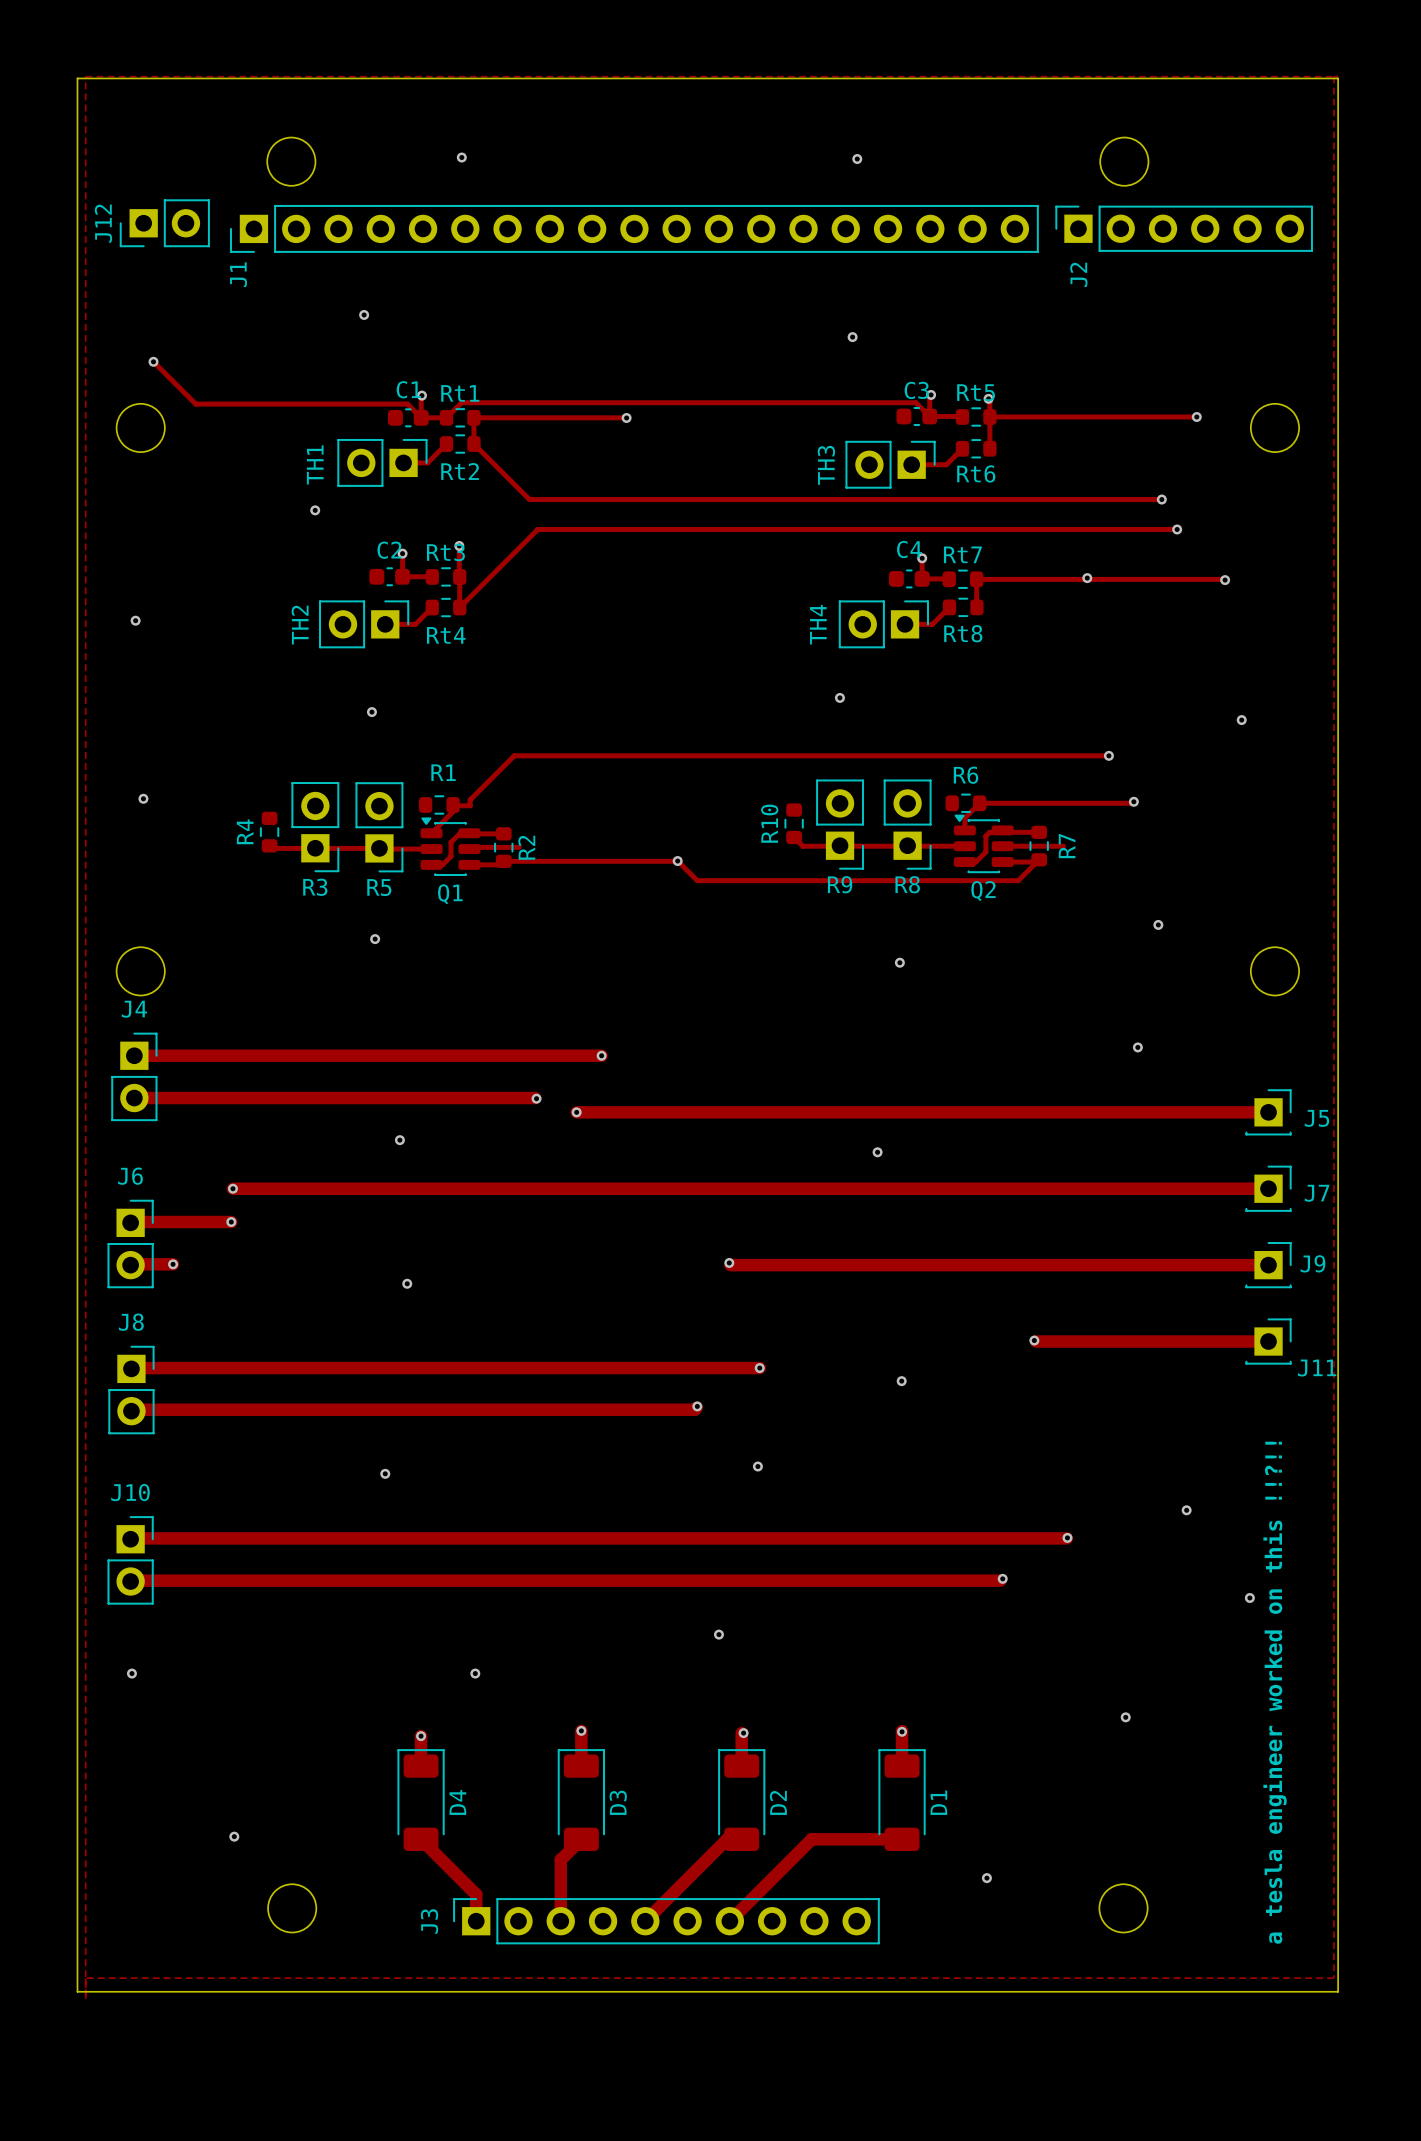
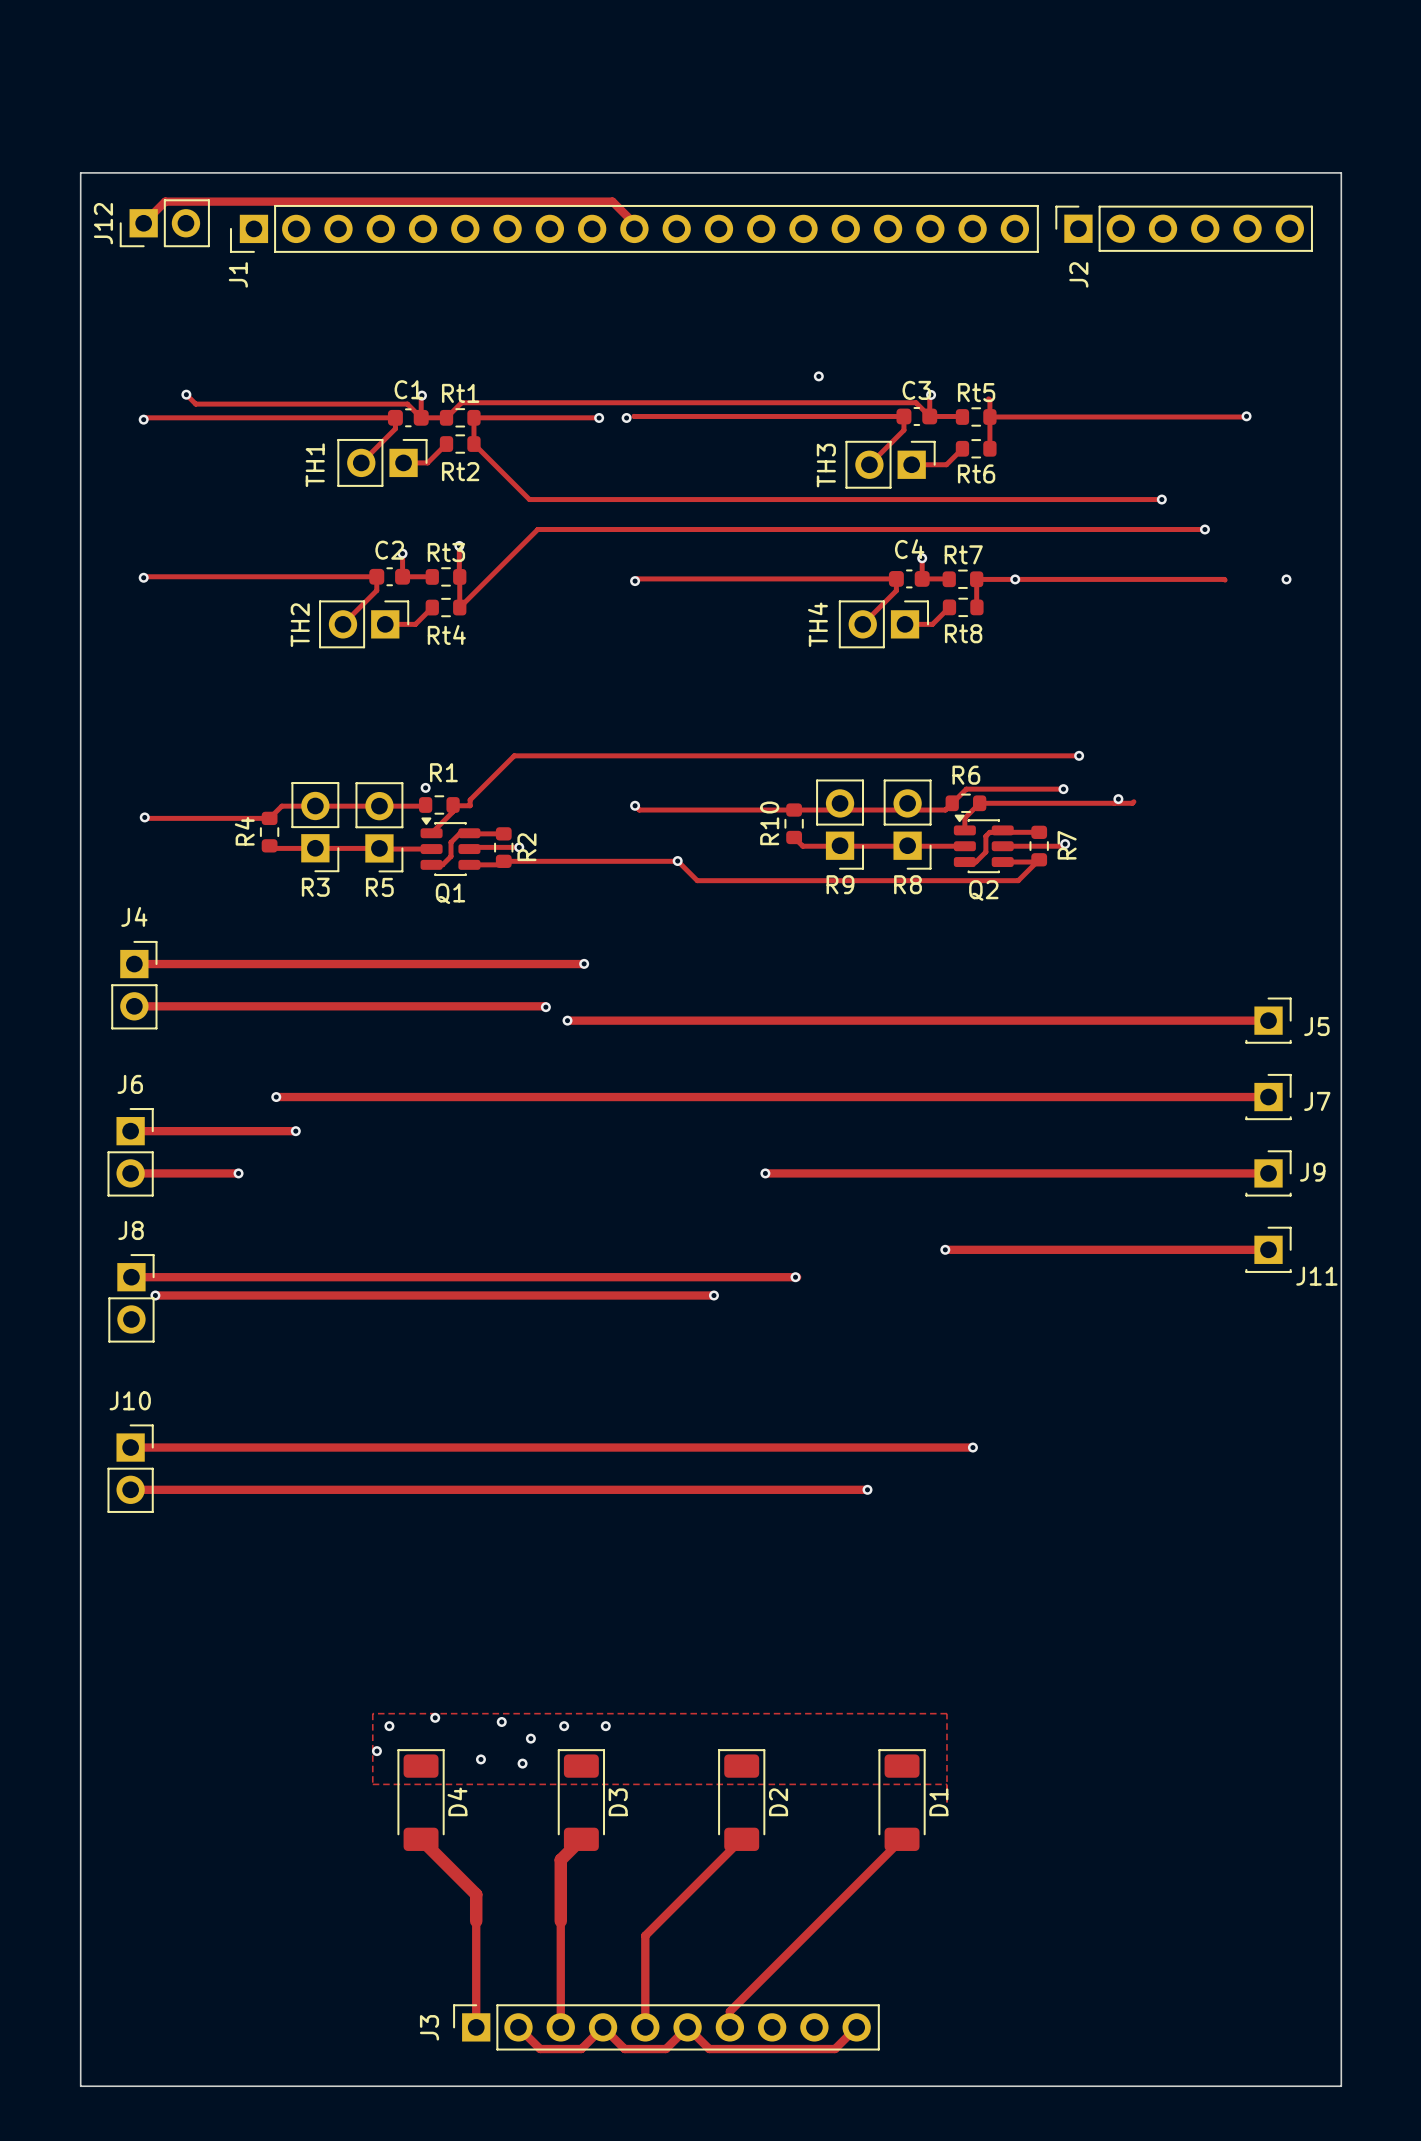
zone outline: (1333, 76) (1333, 1978) (85, 1978) -> none
zone outline: (1338, 76) (85, 76) (85, 1998) -> none
board edge: (77, 78) (1338, 78) (1338, 1991) (77, 1991) (77, 78) -> (80, 172) (1341, 172) (1341, 2086) (80, 2086) (80, 172)
round board edge: [266, 137, 316, 187] -> none
round board edge: [1099, 137, 1149, 187] -> none
via: (461, 157) -> none
via: (857, 159) -> none
track: none -> (143, 223) (165, 201) (612, 201) (635, 224)
via: (364, 314) -> none
via position: (852, 337) -> (818, 376)
track: (152, 361) (186, 394) -> none
via: (153, 361) -> none
via: none -> (186, 394)
via: (988, 398) -> none
round board edge: [116, 403, 166, 453] -> none
round board edge: [1250, 403, 1300, 453] -> none
track: none -> (634, 416) (903, 416) (903, 430) (869, 464)
via position: (1196, 416) -> (1246, 416)
track: none -> (1246, 416) (1196, 416)
track: (598, 417) (626, 417) -> none
via: none -> (599, 417)
track: none -> (143, 419) (145, 417) (395, 417) (395, 428) (361, 462)
via: none -> (143, 419)
via: (315, 510) -> none
track: none -> (1177, 529) (1204, 529)
via: (1177, 529) -> none
via: none -> (1204, 529)
track: none -> (143, 577) (376, 576) (376, 590) (342, 624)
via: (1087, 578) -> none
via: none -> (1015, 579)
via: none -> (1286, 579)
via: (1225, 580) -> none
track: none -> (635, 581) (637, 578) (896, 578) (896, 590) (862, 624)
via: none -> (635, 581)
via position: (135, 620) -> (143, 577)
via: (839, 697) -> none
via: (371, 712) -> none
via: (1241, 720) -> none
via: none -> (1079, 755)
via: (1108, 755) -> none
track: (1109, 755) (1079, 755) -> none
via: none -> (425, 787)
track: none -> (1063, 789) (966, 789) (945, 810) (639, 810) (635, 805)
via: none -> (1063, 789)
via position: (143, 798) -> (144, 817)
via position: (1133, 801) -> (1118, 799)
via: none -> (635, 805)
track: none -> (424, 806) (281, 806) (269, 818) (144, 817)
via: none -> (1065, 844)
via: none -> (519, 847)
via: (1158, 924) -> none
via: (375, 939) -> none
round board edge: [116, 946, 166, 996] -> none
round board edge: [1250, 946, 1300, 996] -> none
via: (899, 962) -> none
via: none -> (584, 963)
track: none -> (134, 964) (583, 964)
track: none -> (134, 1006) (545, 1007)
via: none -> (545, 1007)
track: none -> (567, 1020) (1268, 1020)
via: none -> (567, 1020)
via: (1137, 1047) -> none
track: (134, 1055) (601, 1055) -> none
via: (601, 1055) -> none
J4 position: (134, 1076) -> (134, 985)
track: none -> (276, 1097) (1268, 1097)
via: none -> (276, 1097)
track: (134, 1098) (535, 1098) -> none
via: (536, 1098) -> none
track: (576, 1112) (1268, 1112) -> none
via: (576, 1112) -> none
J5 position: (1268, 1112) -> (1268, 1020)
track: none -> (130, 1131) (295, 1131)
via: none -> (295, 1131)
via: (399, 1140) -> none
via: (877, 1152) -> none
track: none -> (130, 1173) (238, 1173)
track: none -> (765, 1173) (1268, 1173)
via: none -> (765, 1173)
track: (232, 1188) (1268, 1188) -> none
via position: (232, 1188) -> (238, 1173)
J7 position: (1268, 1188) -> (1268, 1097)
track: (130, 1222) (231, 1222) -> none
via: (231, 1222) -> none
J6 position: (130, 1243) -> (130, 1152)
track: none -> (945, 1249) (1268, 1249)
via: none -> (945, 1249)
via: (729, 1262) -> none
track: (130, 1264) (173, 1264) -> none
via position: (173, 1264) -> (155, 1295)
track: (730, 1265) (1268, 1265) -> none
J9 position: (1268, 1265) -> (1268, 1173)
track: none -> (131, 1277) (797, 1277)
via: none -> (795, 1277)
via: (407, 1283) -> none
track: none -> (155, 1295) (713, 1295)
via: none -> (713, 1295)
via: (1034, 1340) -> none
track: (1036, 1341) (1268, 1341) -> none
J11 position: (1268, 1341) -> (1268, 1249)
track: (131, 1368) (759, 1368) -> none
via: (759, 1368) -> none
via: (901, 1381) -> none
J8 position: (131, 1390) -> (131, 1298)
via: (697, 1406) -> none
track: (696, 1407) (694, 1409) (135, 1409) -> none
track: none -> (130, 1447) (972, 1447)
via: none -> (972, 1447)
via: (757, 1466) -> none
via: (385, 1473) -> none
track: none -> (130, 1489) (867, 1489)
via: none -> (867, 1489)
via: (1186, 1510) -> none
via: (1067, 1537) -> none
track: (130, 1538) (1066, 1538) -> none
J10 position: (130, 1560) -> (130, 1468)
via: (1002, 1578) -> none
track: (130, 1580) (1000, 1580) -> none
via: (1249, 1597) -> none
via: (718, 1634) -> none
via: (131, 1673) -> none
via: (475, 1673) -> none
text: a tesla engineer worked on this !!?!! (1275, 1692) -> none
via: none -> (435, 1717)
via: (1125, 1717) -> none
via: none -> (501, 1721)
via: none -> (389, 1726)
via: none -> (564, 1726)
via: none -> (605, 1726)
track: (581, 1730) (581, 1766) -> none
via: (581, 1730) -> none
track: (902, 1731) (902, 1766) -> none
via: (902, 1731) -> none
track: (741, 1733) (741, 1766) -> none
via: (743, 1733) -> none
track: (421, 1736) (421, 1766) -> none
via: (421, 1736) -> none
via: none -> (530, 1738)
via: none -> (376, 1751)
via: none -> (480, 1759)
via: none -> (522, 1763)
zone outline: none -> (946, 1784) (372, 1784) (372, 1713) (946, 1713) (946, 1802)
via: (234, 1836) -> none
track: (741, 1839) (727, 1839) (645, 1921) -> (741, 1839) (645, 1935) (645, 2027)
track: (902, 1839) (811, 1839) (729, 1921) -> (902, 1839) (729, 2011) (729, 2027)
via: (986, 1878) -> none
round board edge: [267, 1883, 317, 1933] -> none
round board edge: [1098, 1883, 1149, 1933] -> none
track: none -> (476, 1921) (476, 2027)
track: none -> (560, 1921) (560, 2027)
J3 position: (666, 1921) -> (666, 2027)
track: none -> (518, 2027) (540, 2049) (581, 2049) (603, 2027) (624, 2049) (665, 2049) (687, 2027) (709, 2049) (835, 2049) (856, 2027)

